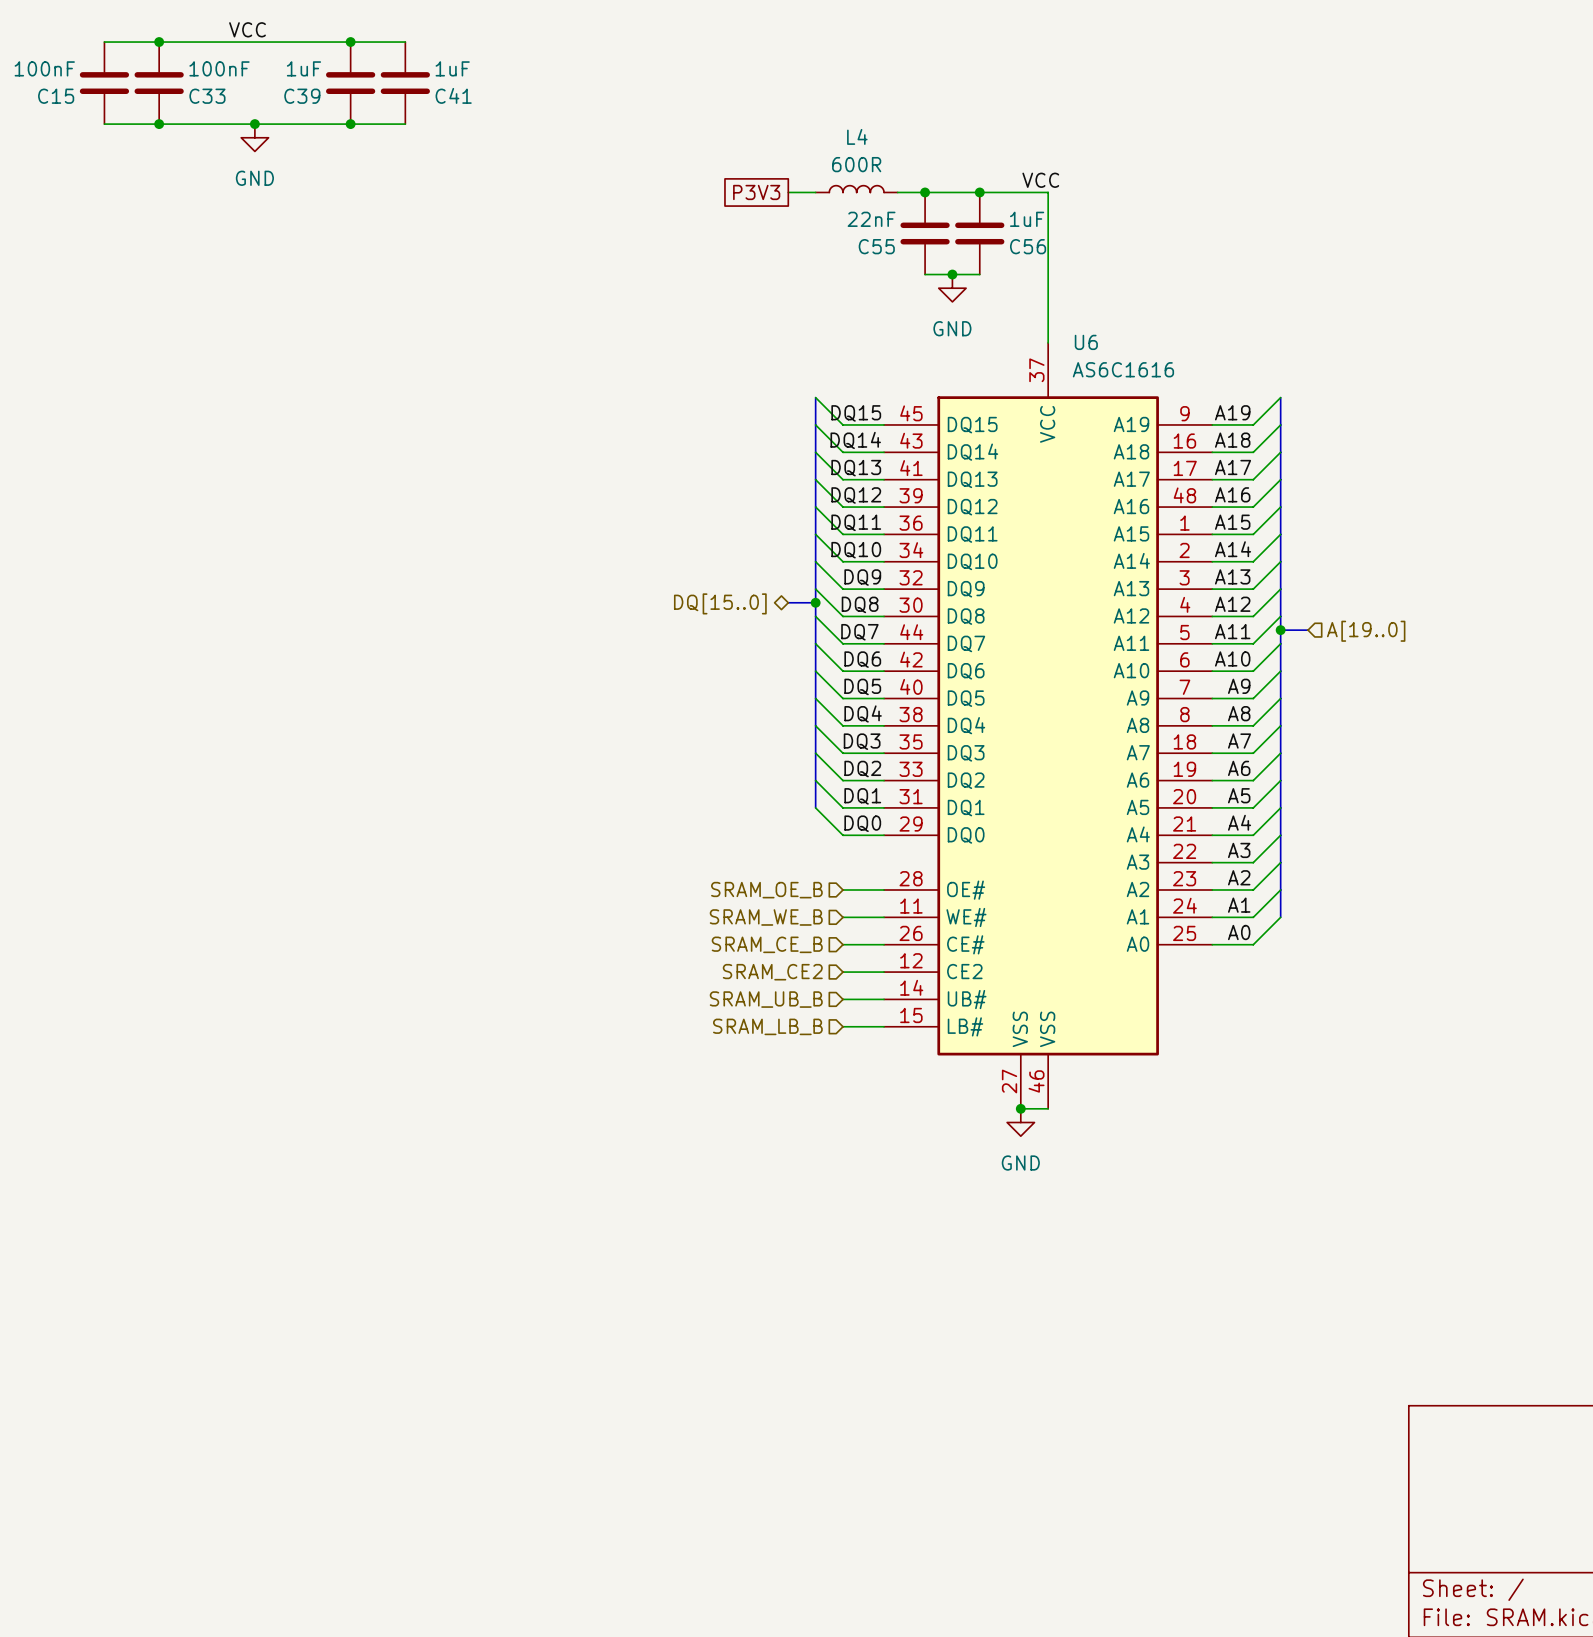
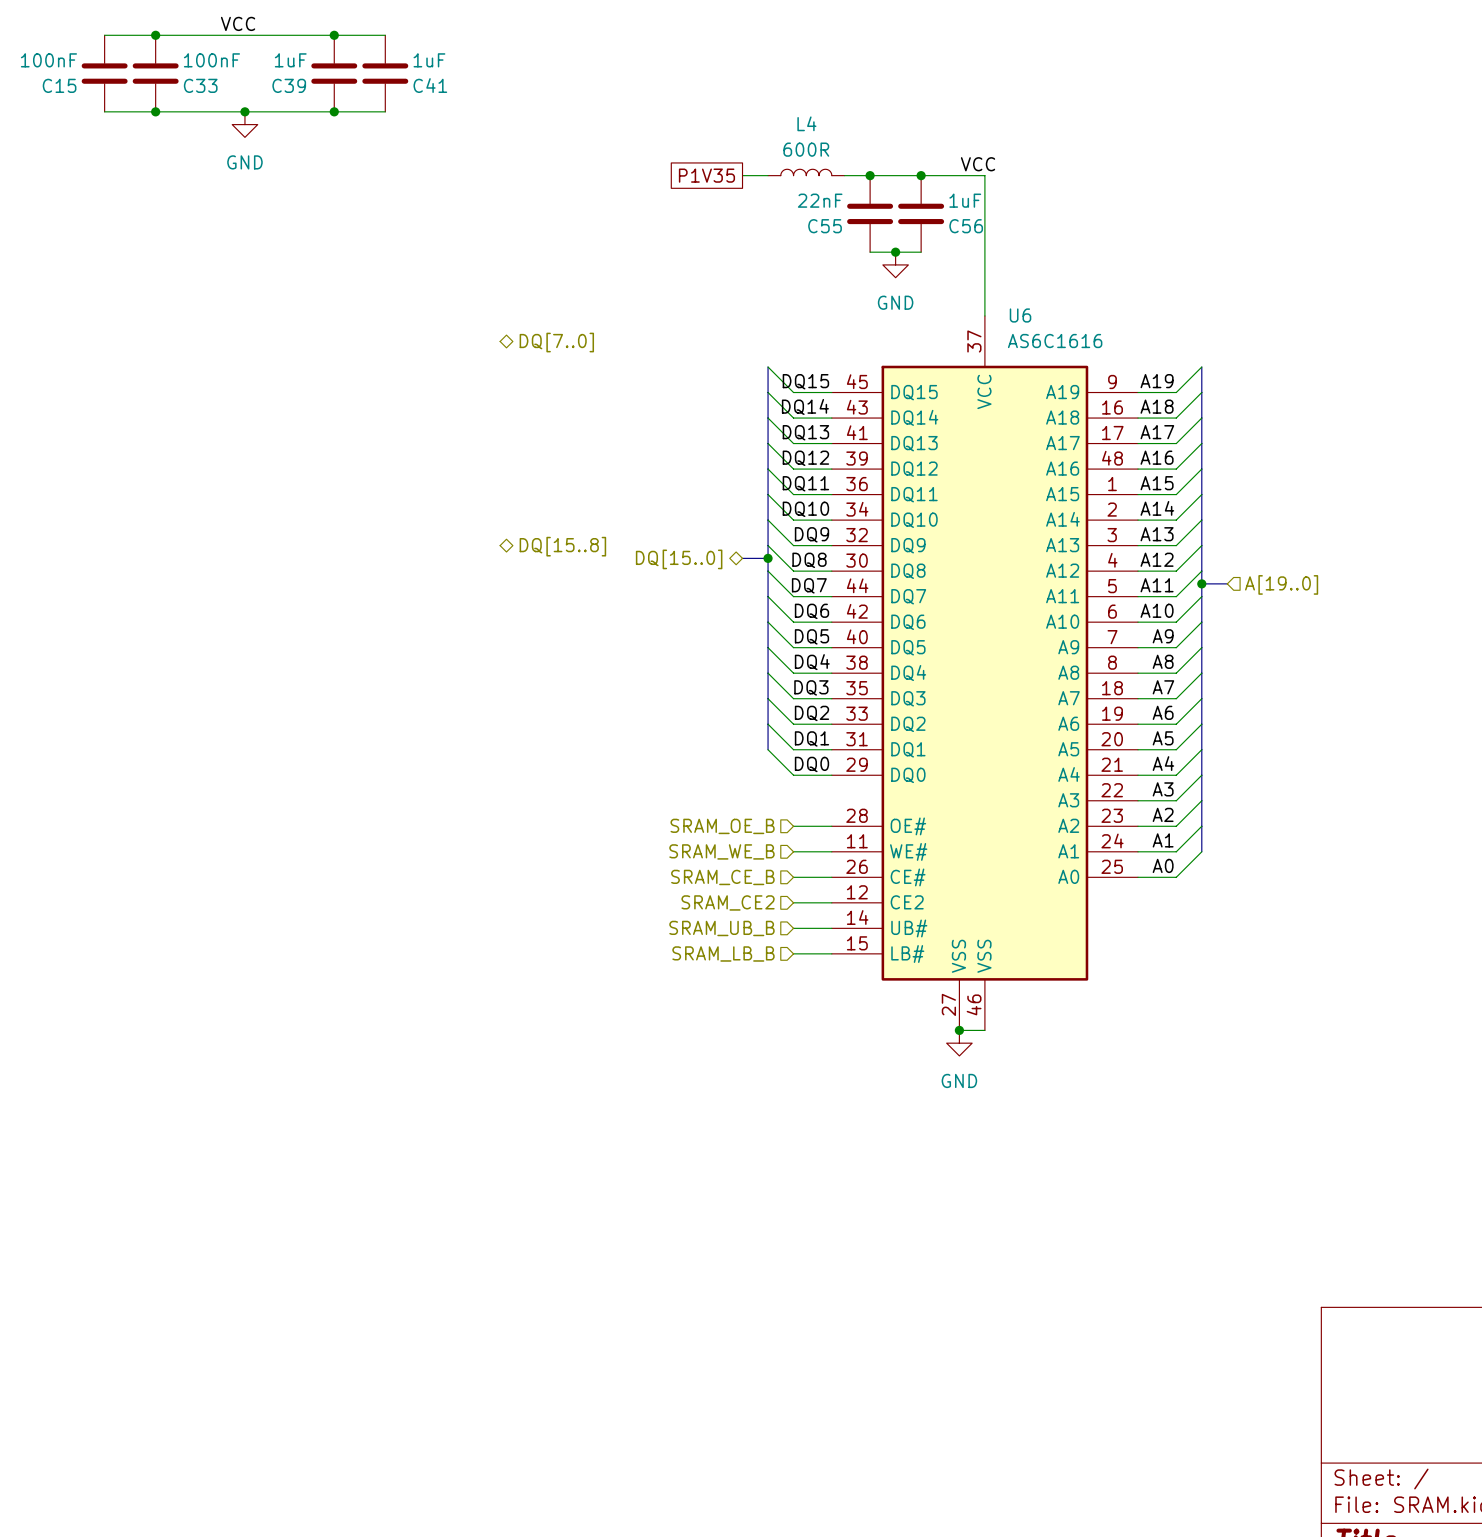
global label: P3V3 (756, 192) -> P1V35 (706, 175)
hierarchical label: none -> DQ[7..0] (556, 342)
hierarchical label: none -> DQ[15..8] (562, 546)

